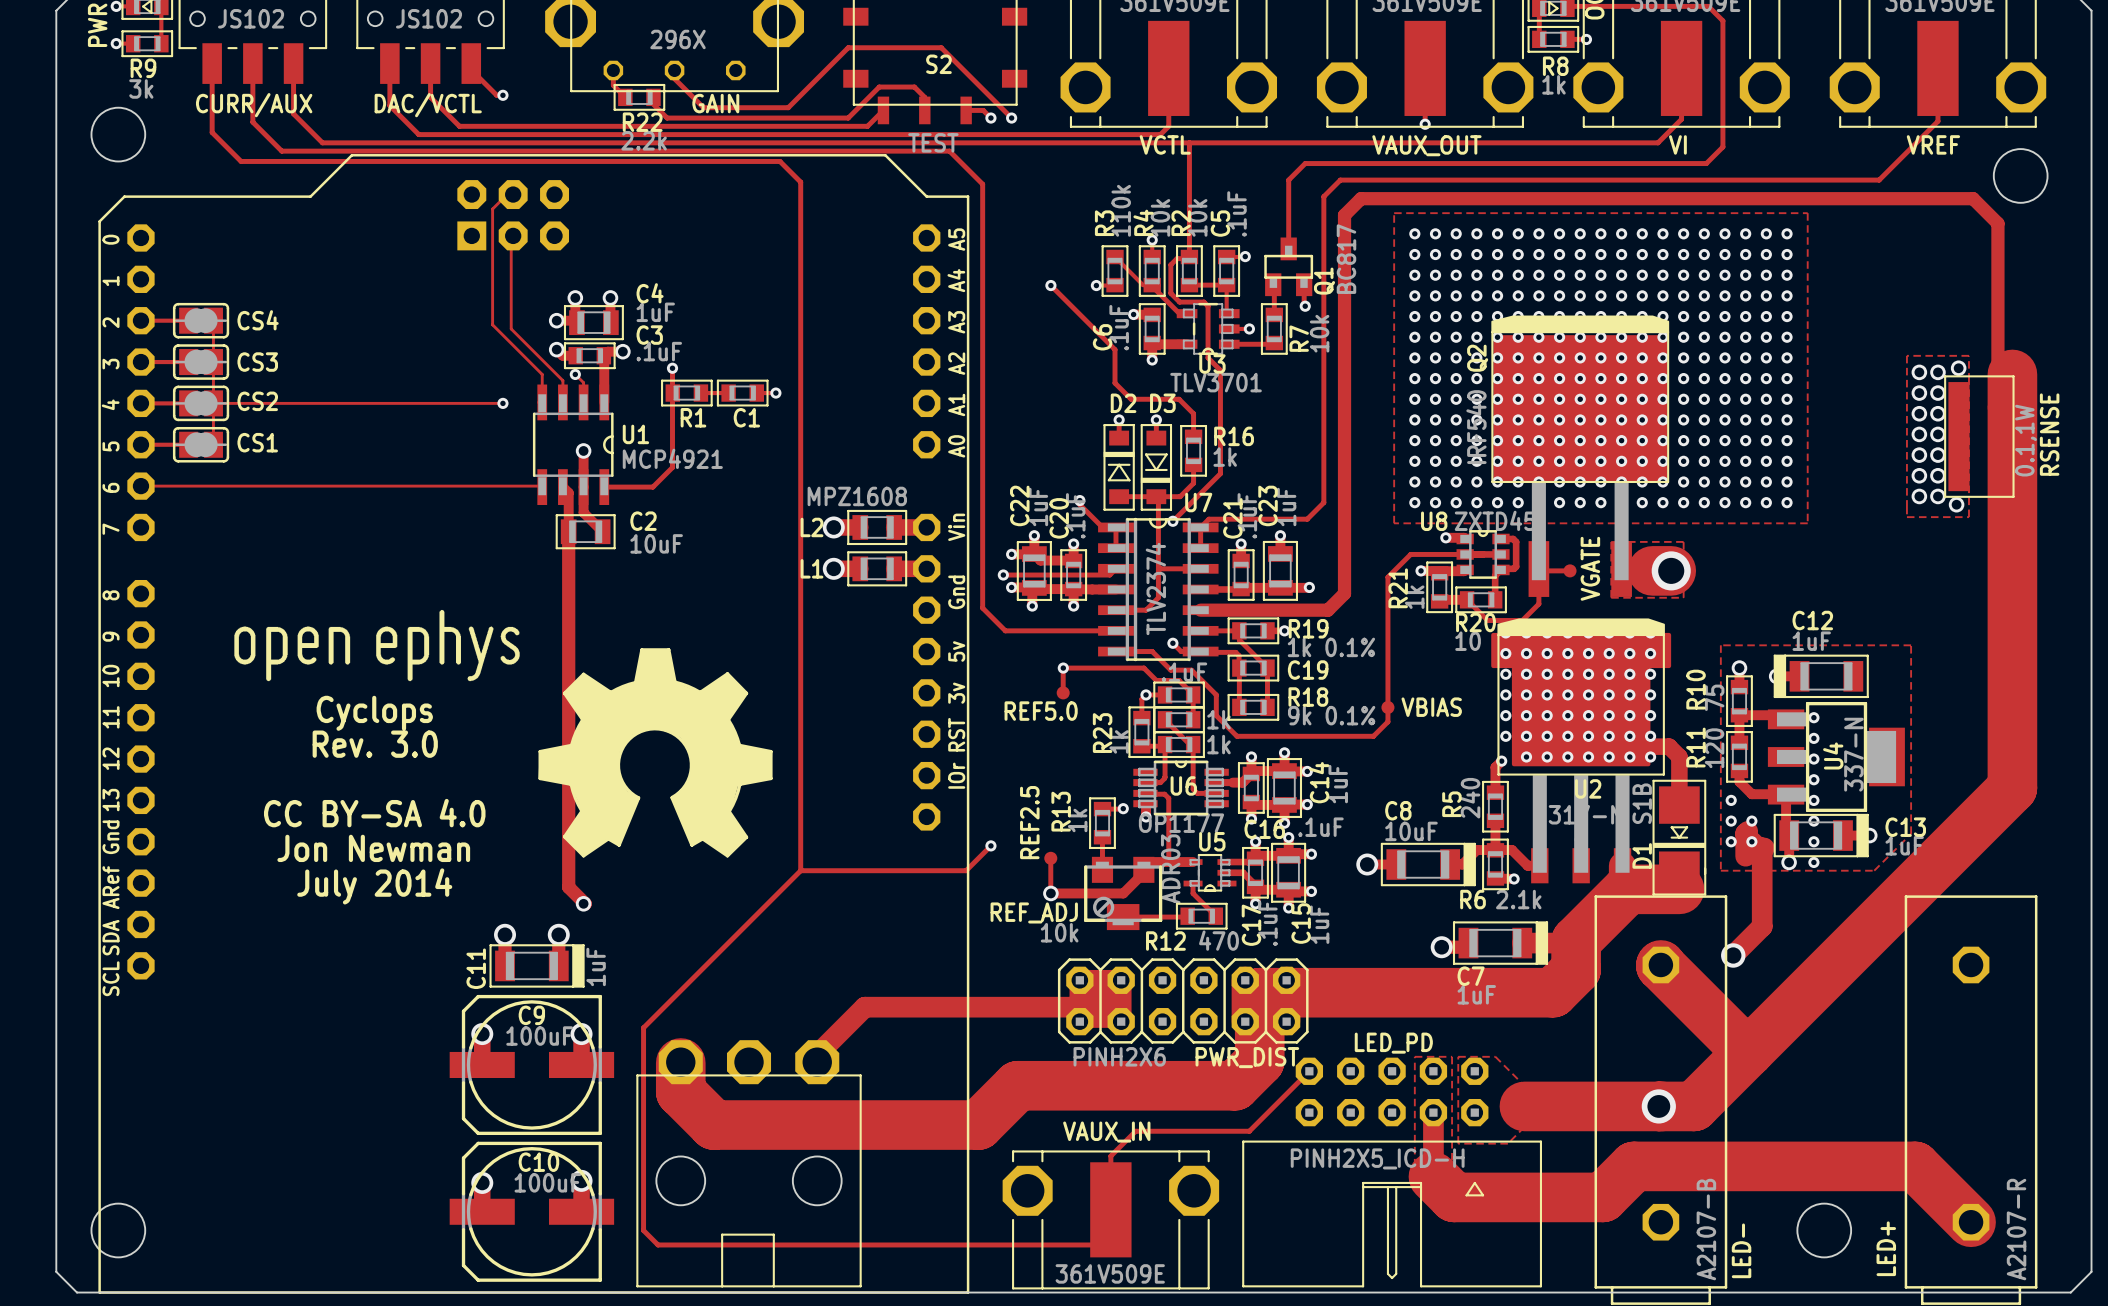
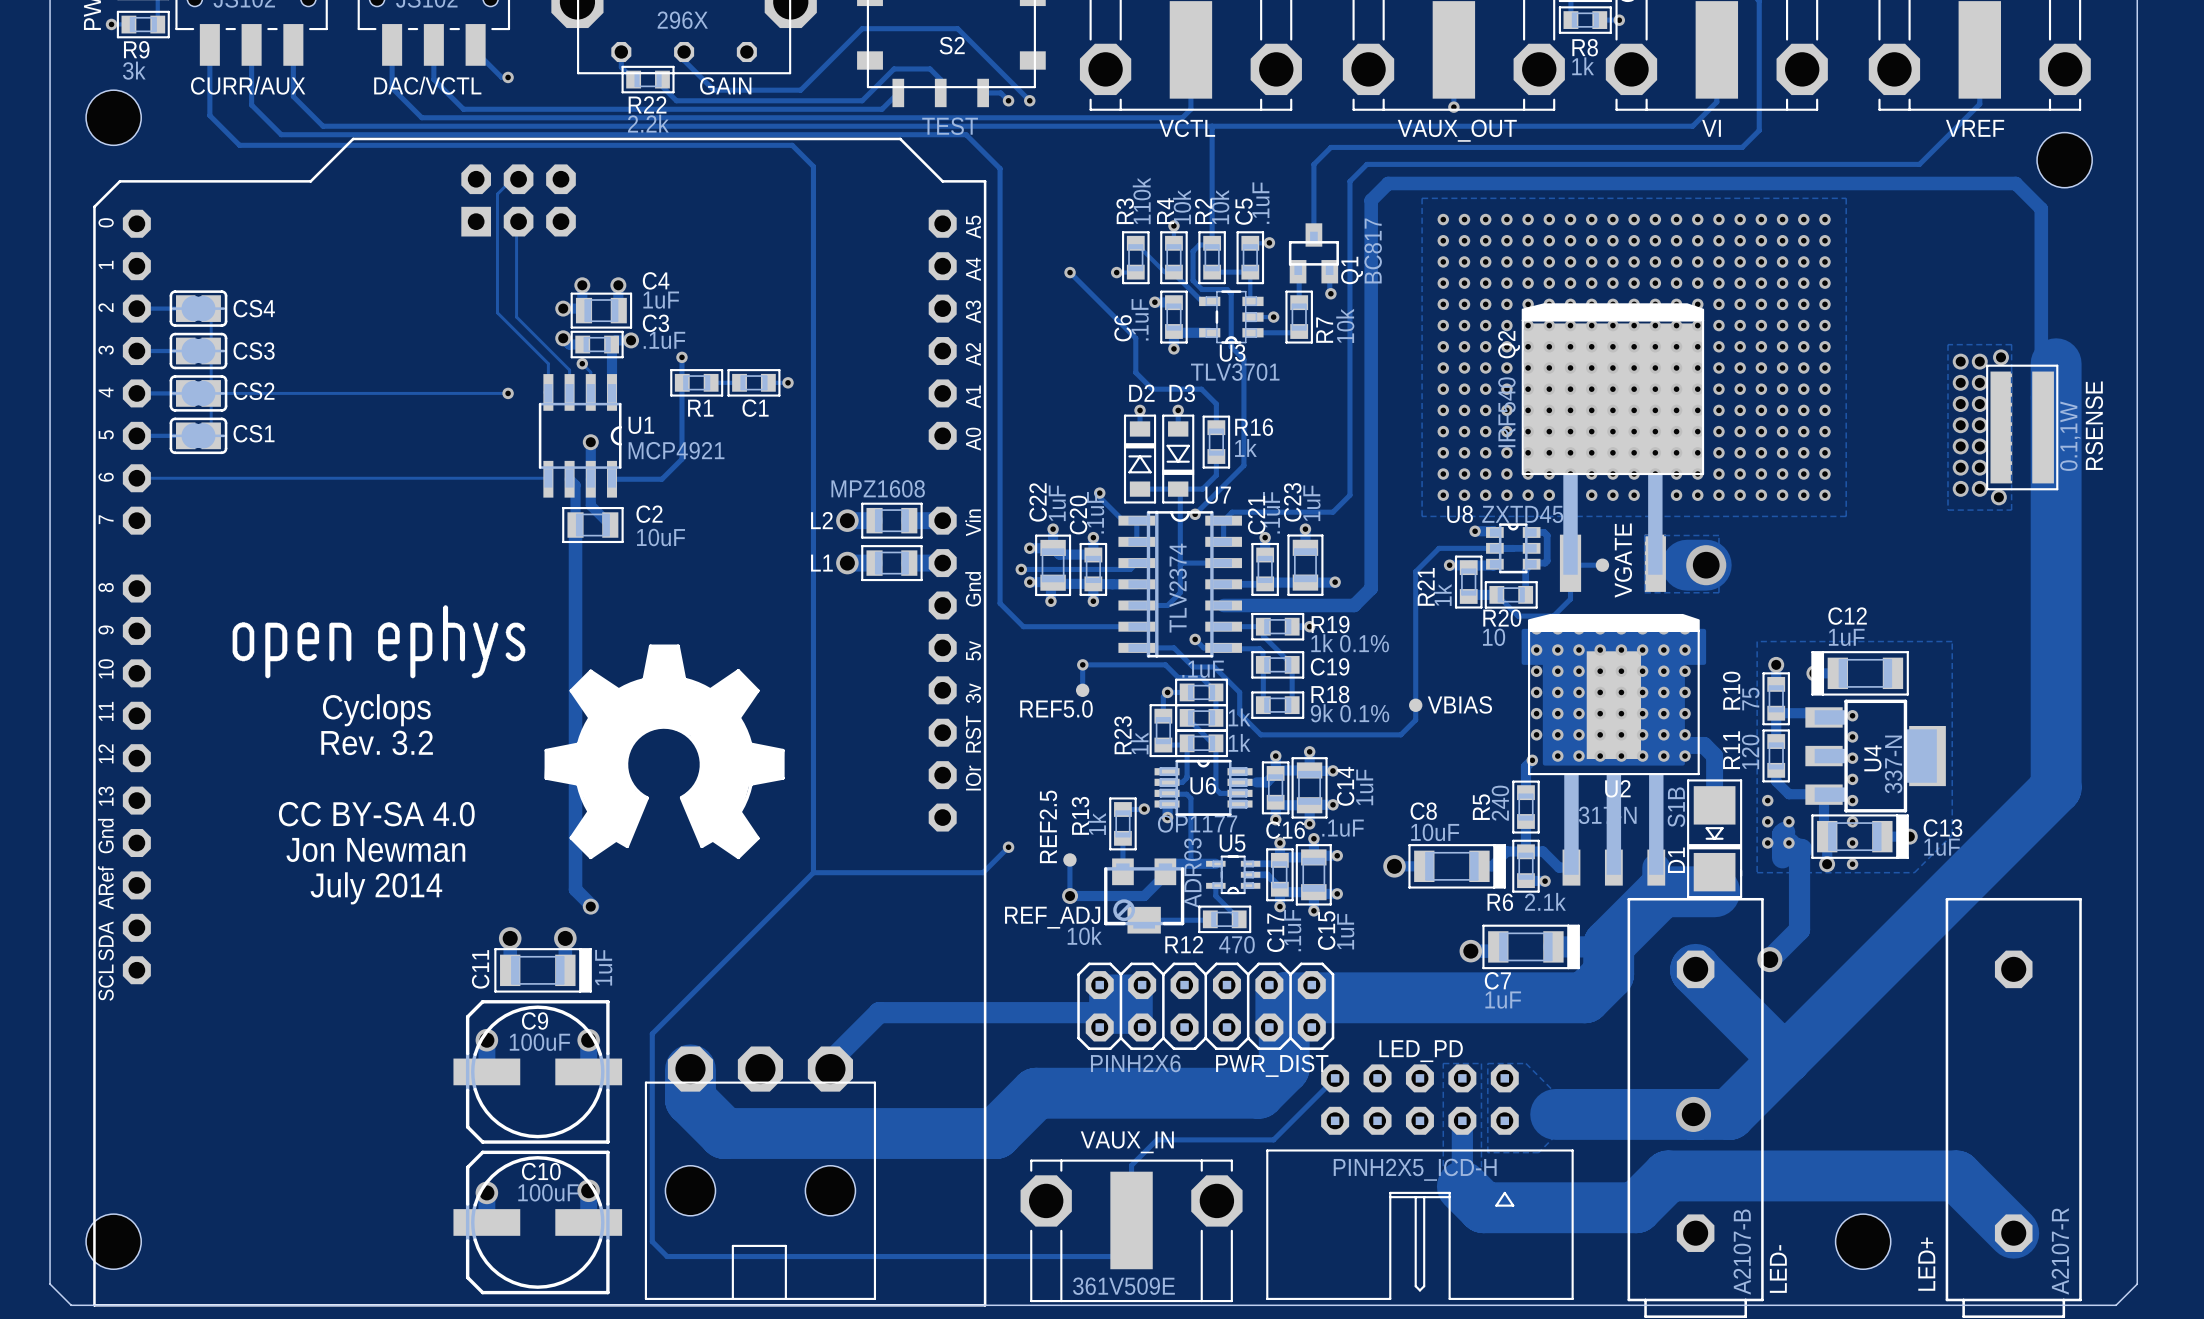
text: Rev. 3.0 (375, 744) -> Rev. 3.2 (377, 742)

